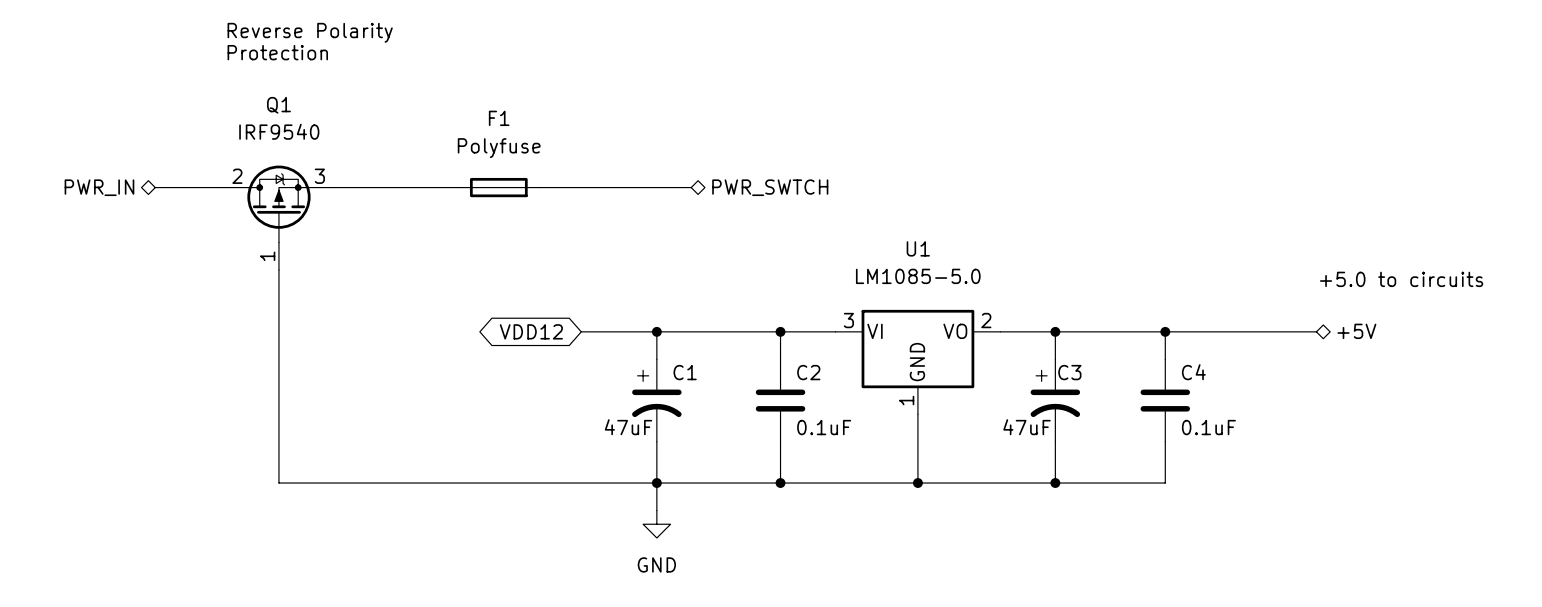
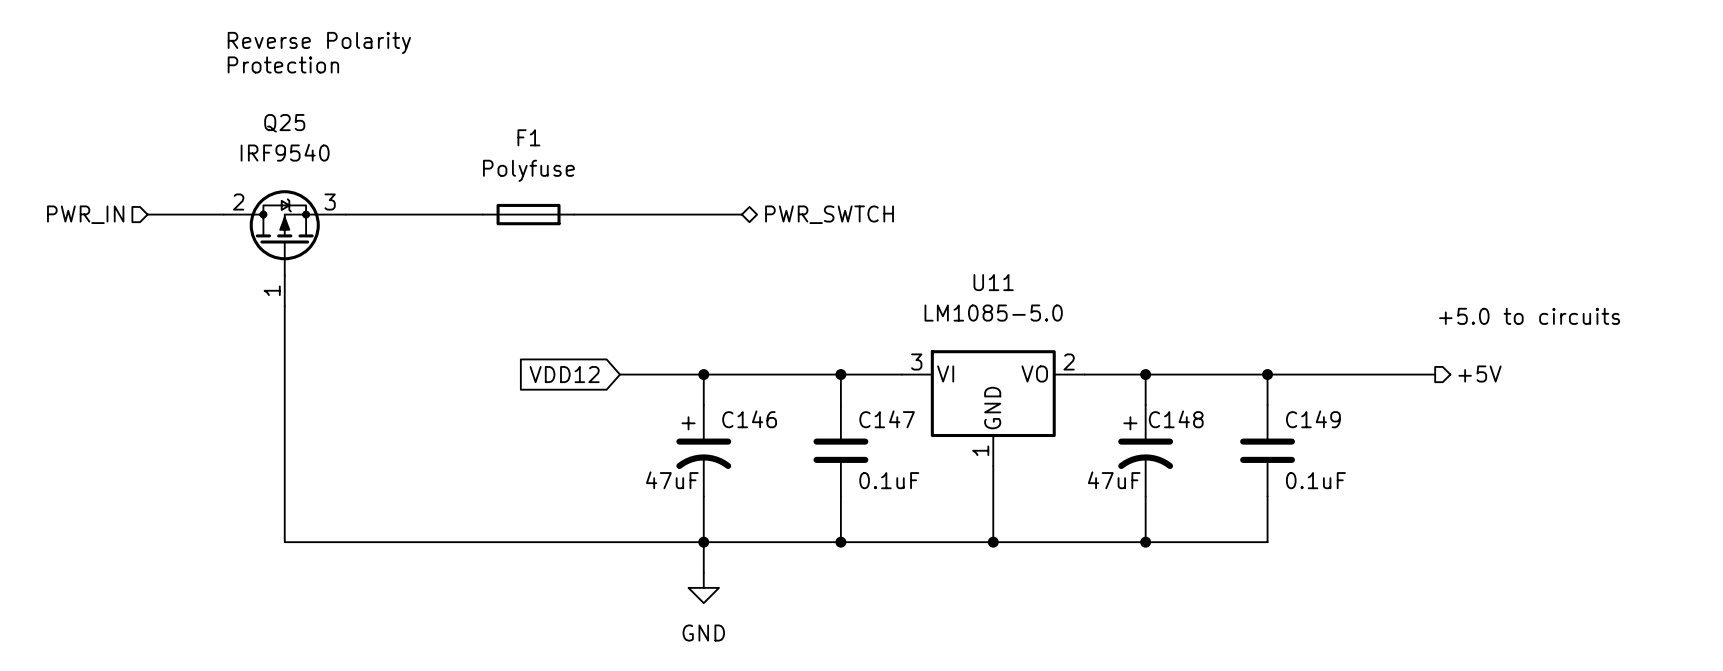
Q1 name: Q1 (278, 105) -> Q25 (284, 123)
hierarchical label shape: bidirectional (99, 187) -> input (85, 214)
U1 name: U1 (918, 248) -> U11 (993, 282)
global label shape: bidirectional (531, 331) -> input (564, 374)
hierarchical label shape: bidirectional (1356, 331) -> output (1480, 373)
C1 name: C1 (685, 372) -> C146 (749, 419)
C2 name: C2 (808, 372) -> C147 (887, 419)
C3 name: C3 (1069, 372) -> C148 (1176, 419)
C4 name: C4 (1193, 372) -> C149 (1313, 419)

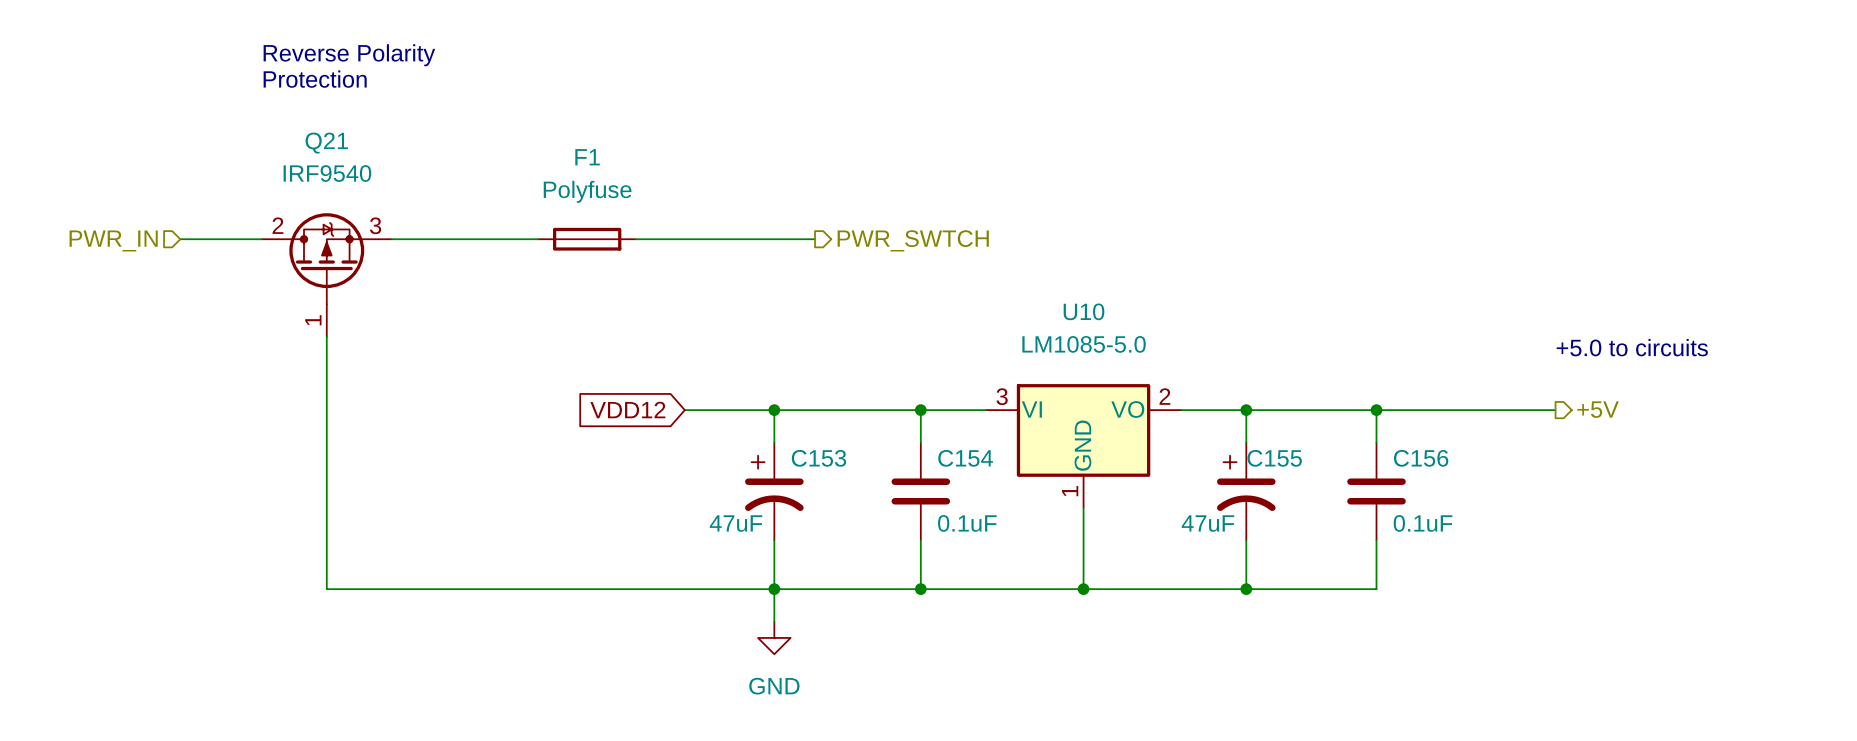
Q25 name: Q25 (284, 123) -> Q21 (326, 143)
hierarchical label shape: bidirectional (829, 214) -> output (913, 240)
U11 name: U11 (993, 282) -> U10 (1084, 311)
C146 name: C146 (749, 419) -> C153 (818, 458)
C147 name: C147 (887, 419) -> C154 (965, 458)
C148 name: C148 (1176, 419) -> C155 (1274, 458)
C149 name: C149 (1313, 419) -> C156 (1421, 458)

